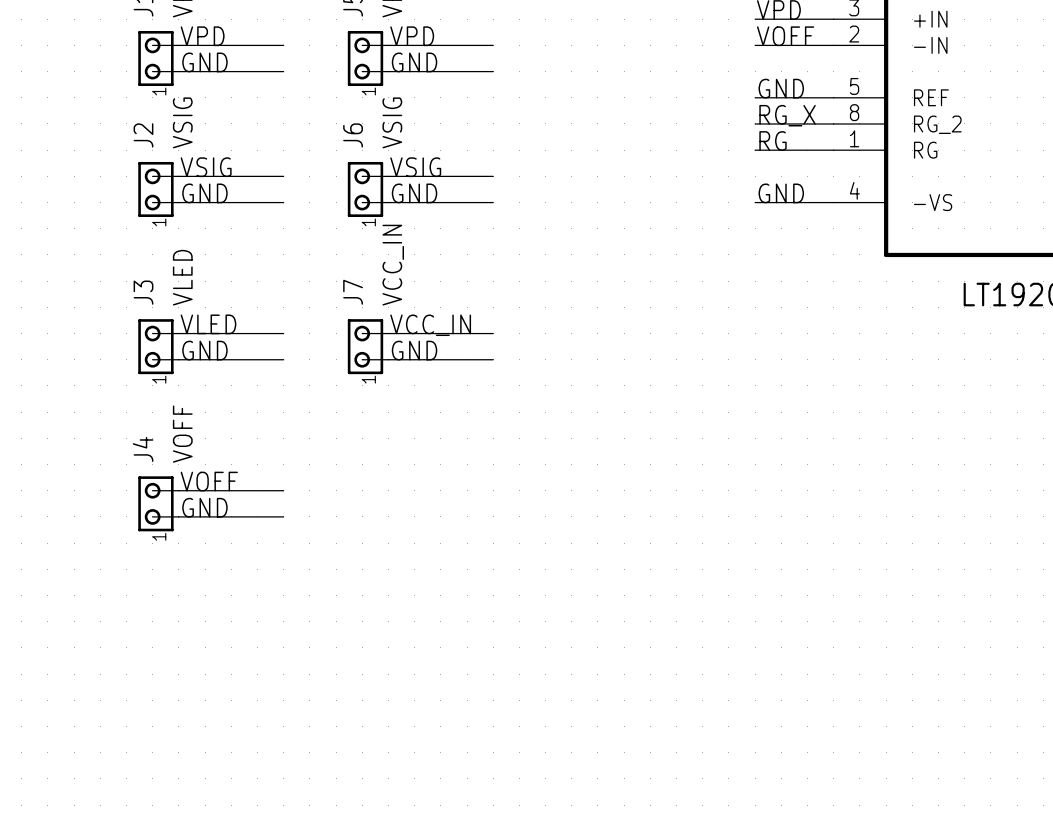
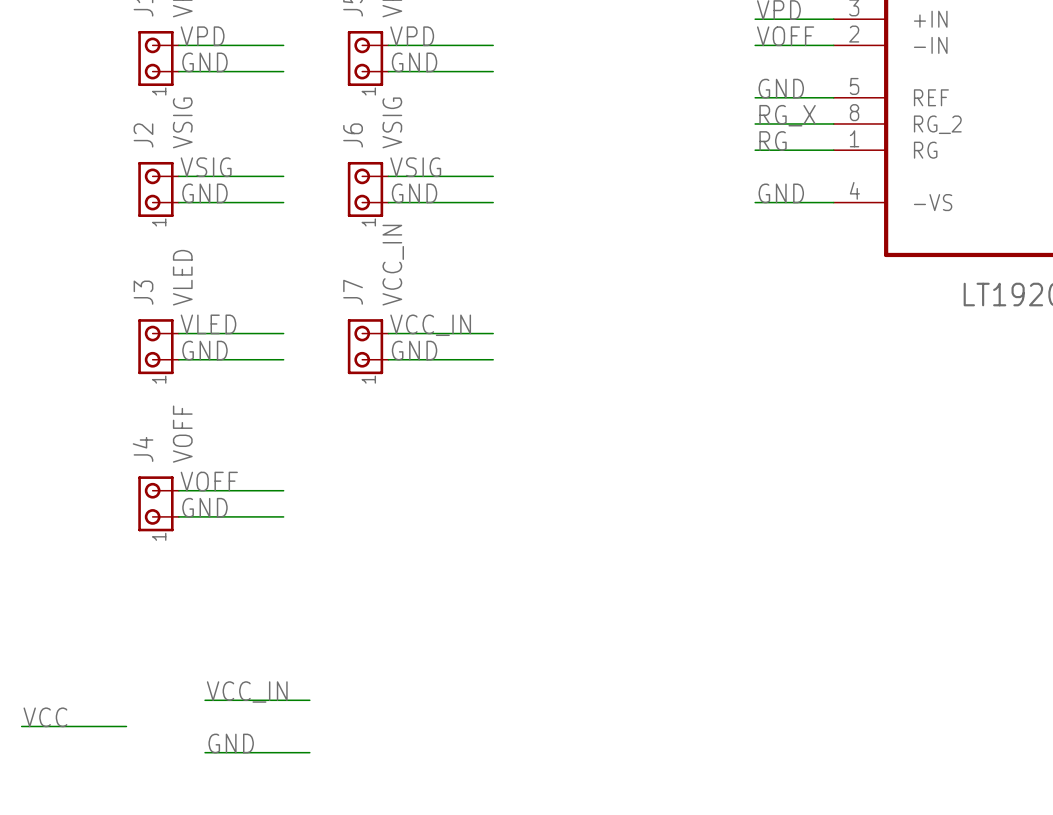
label: none -> VCC_IN (247, 692)
wire: none -> (205, 700) (309, 700)
label: none -> VCC (45, 717)
wire: none -> (21, 726) (126, 726)
label: none -> GND (231, 743)
wire: none -> (205, 752) (309, 752)

